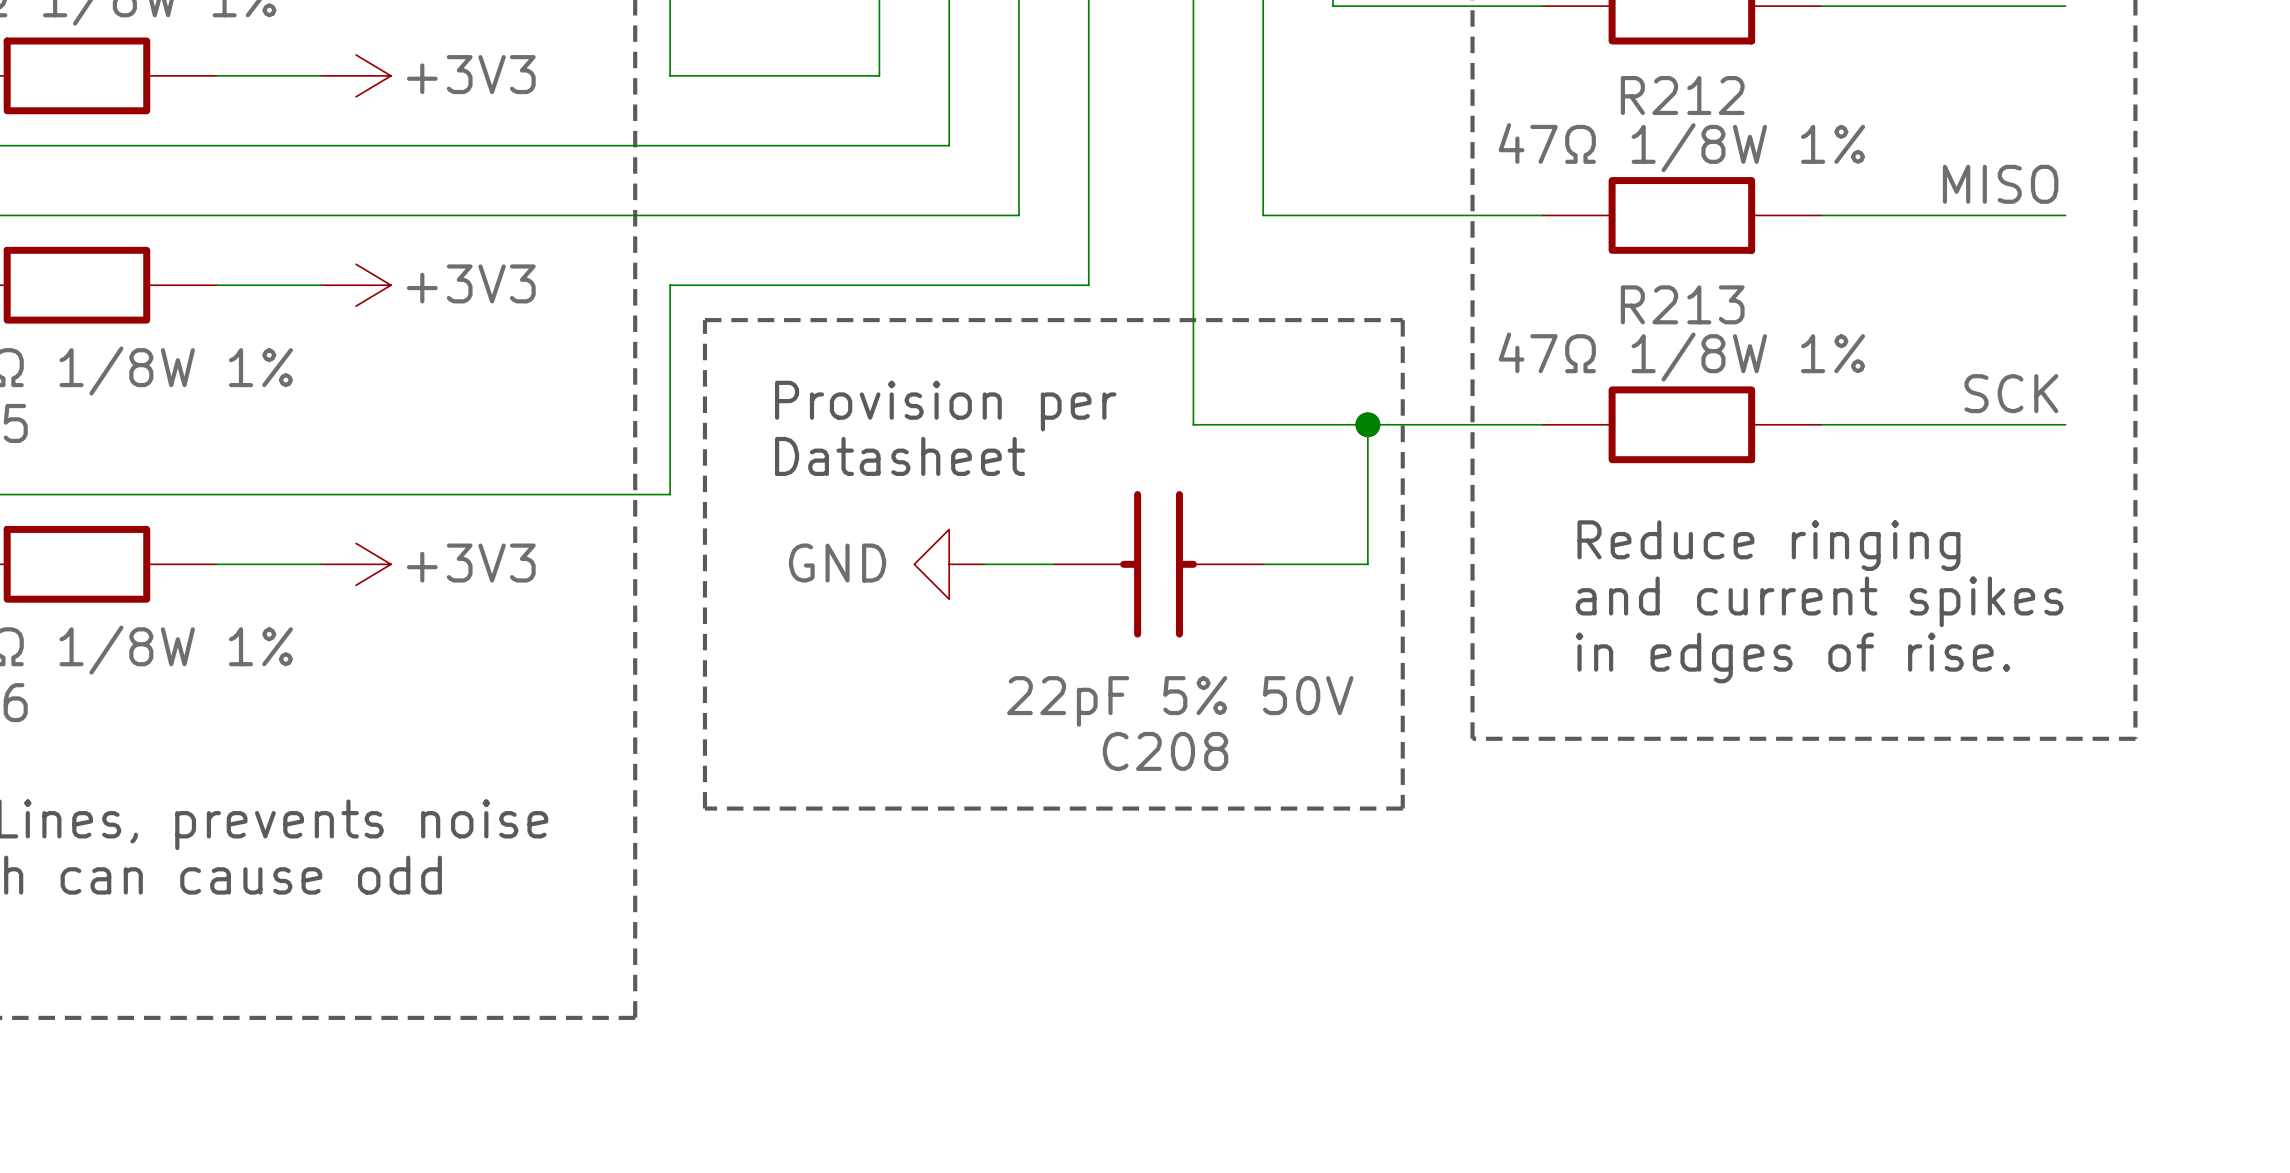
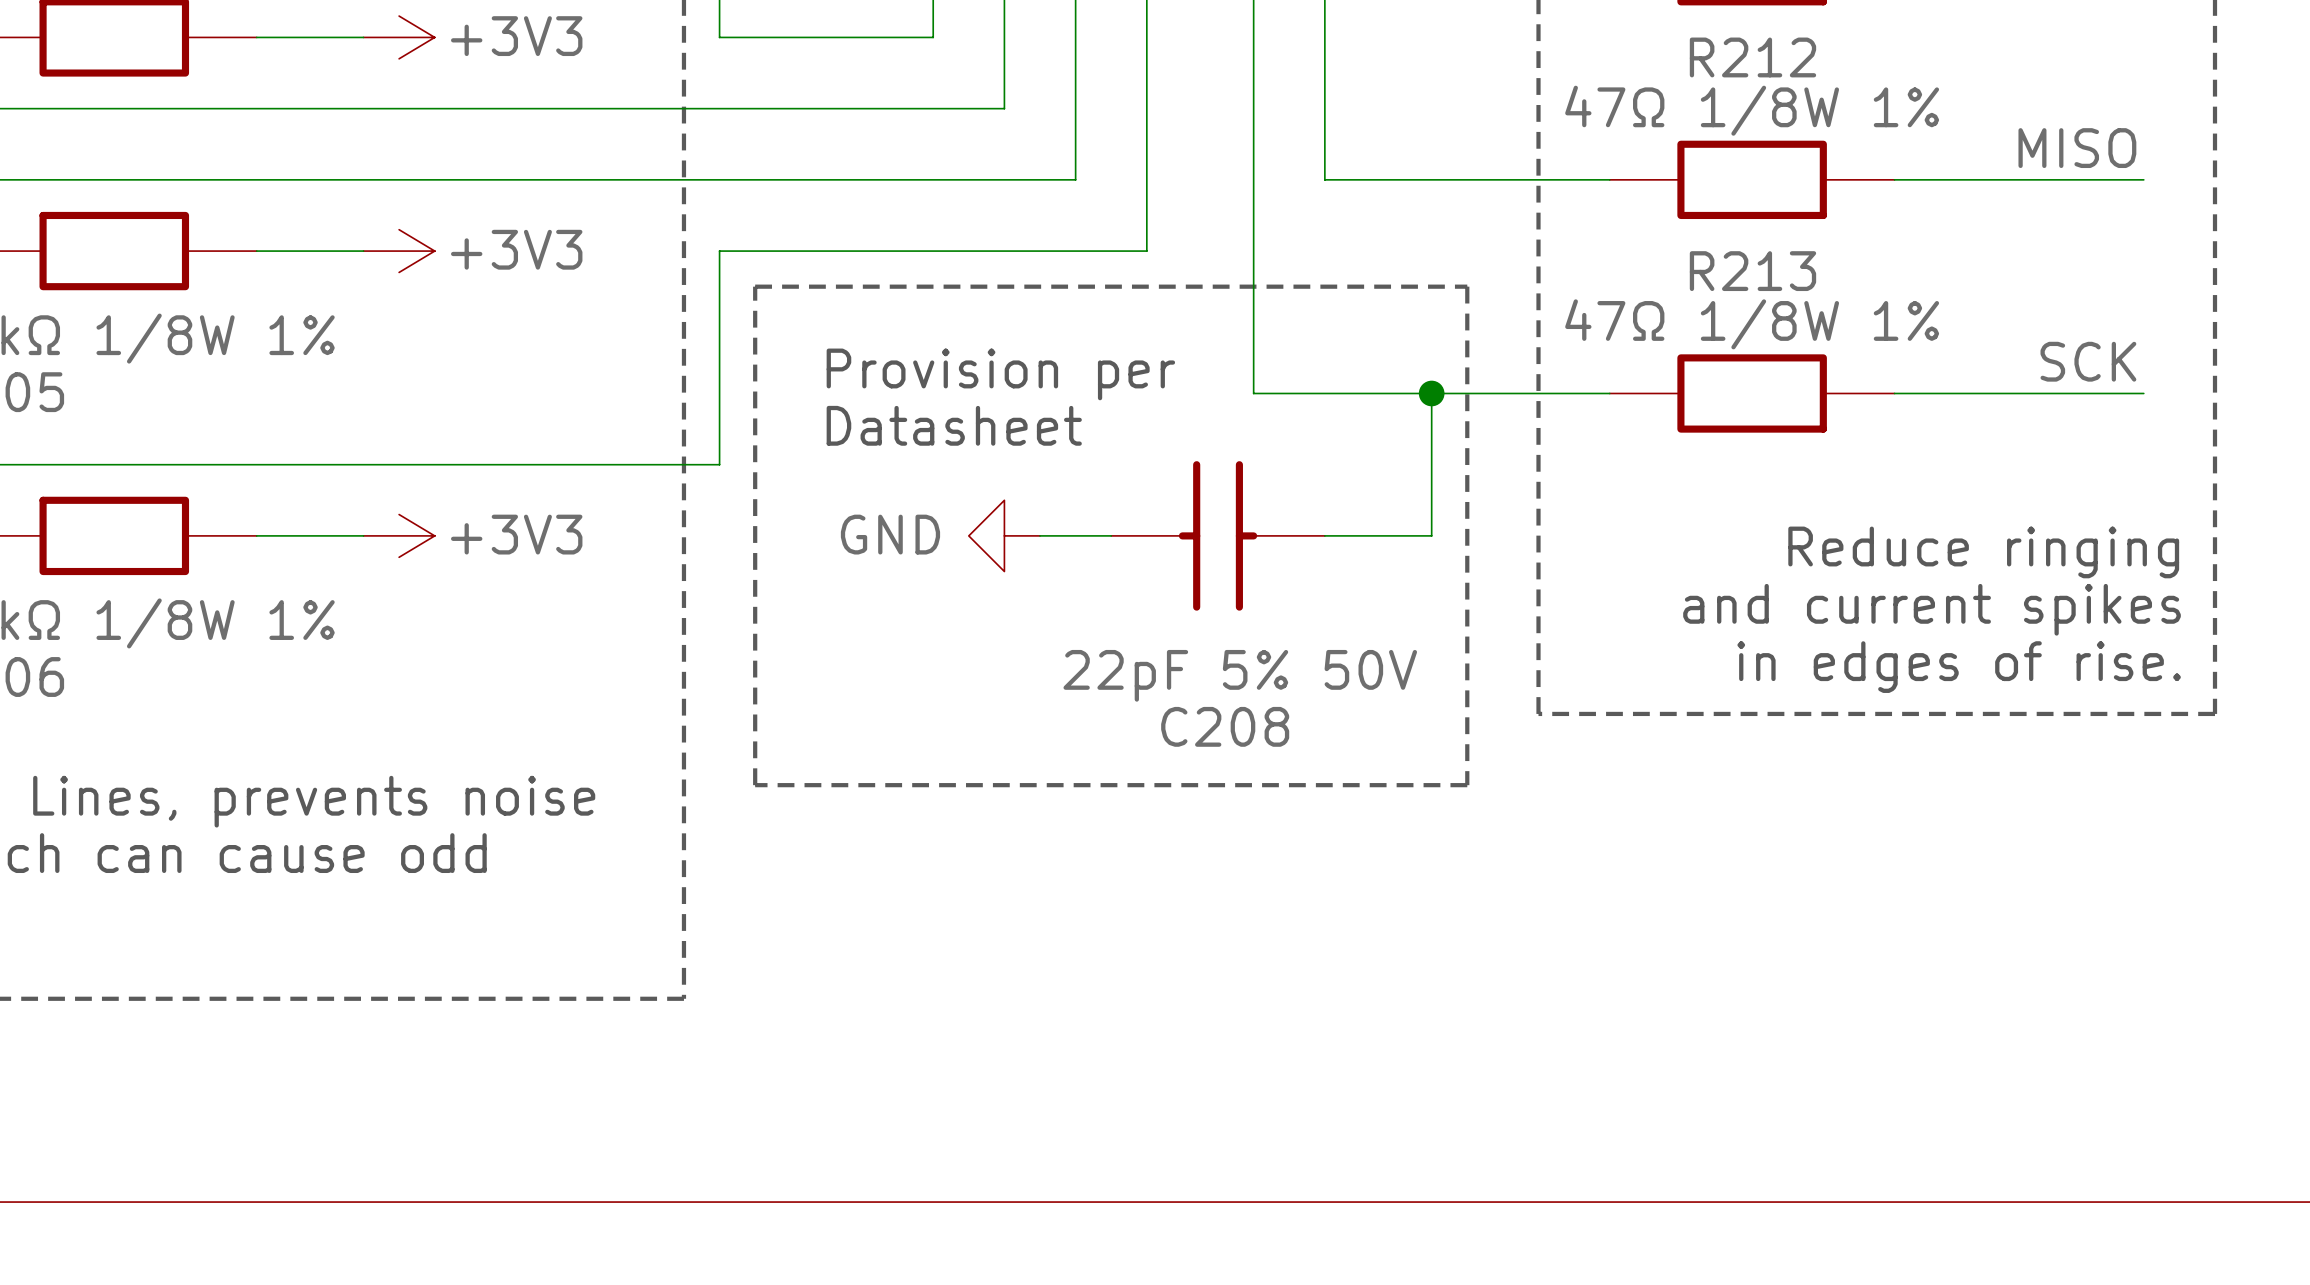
text position: Reduce ringing (1768, 545) -> Reduce ringing (1983, 552)
text position: and current spikes (1819, 601) -> and current spikes (1932, 609)
text position: in edges of rise. (1793, 657) -> in edges of rise. (1959, 667)

